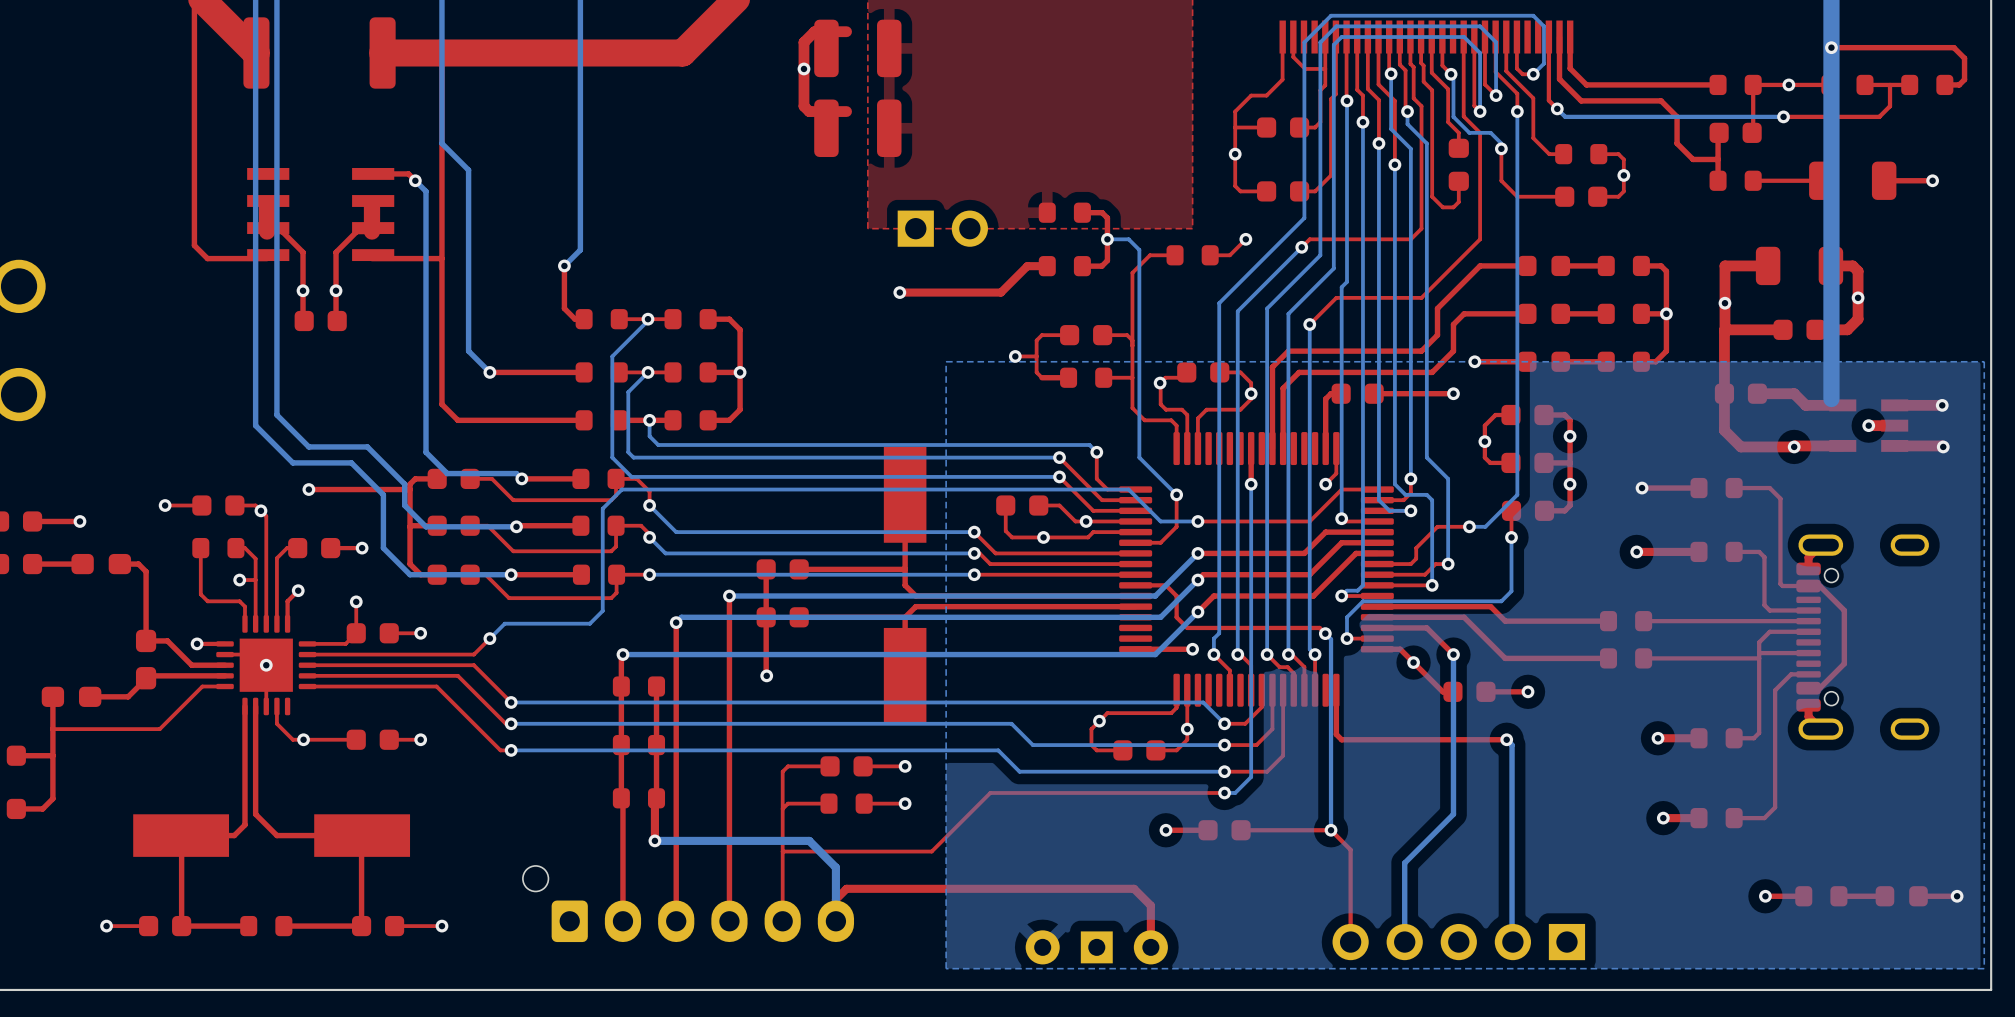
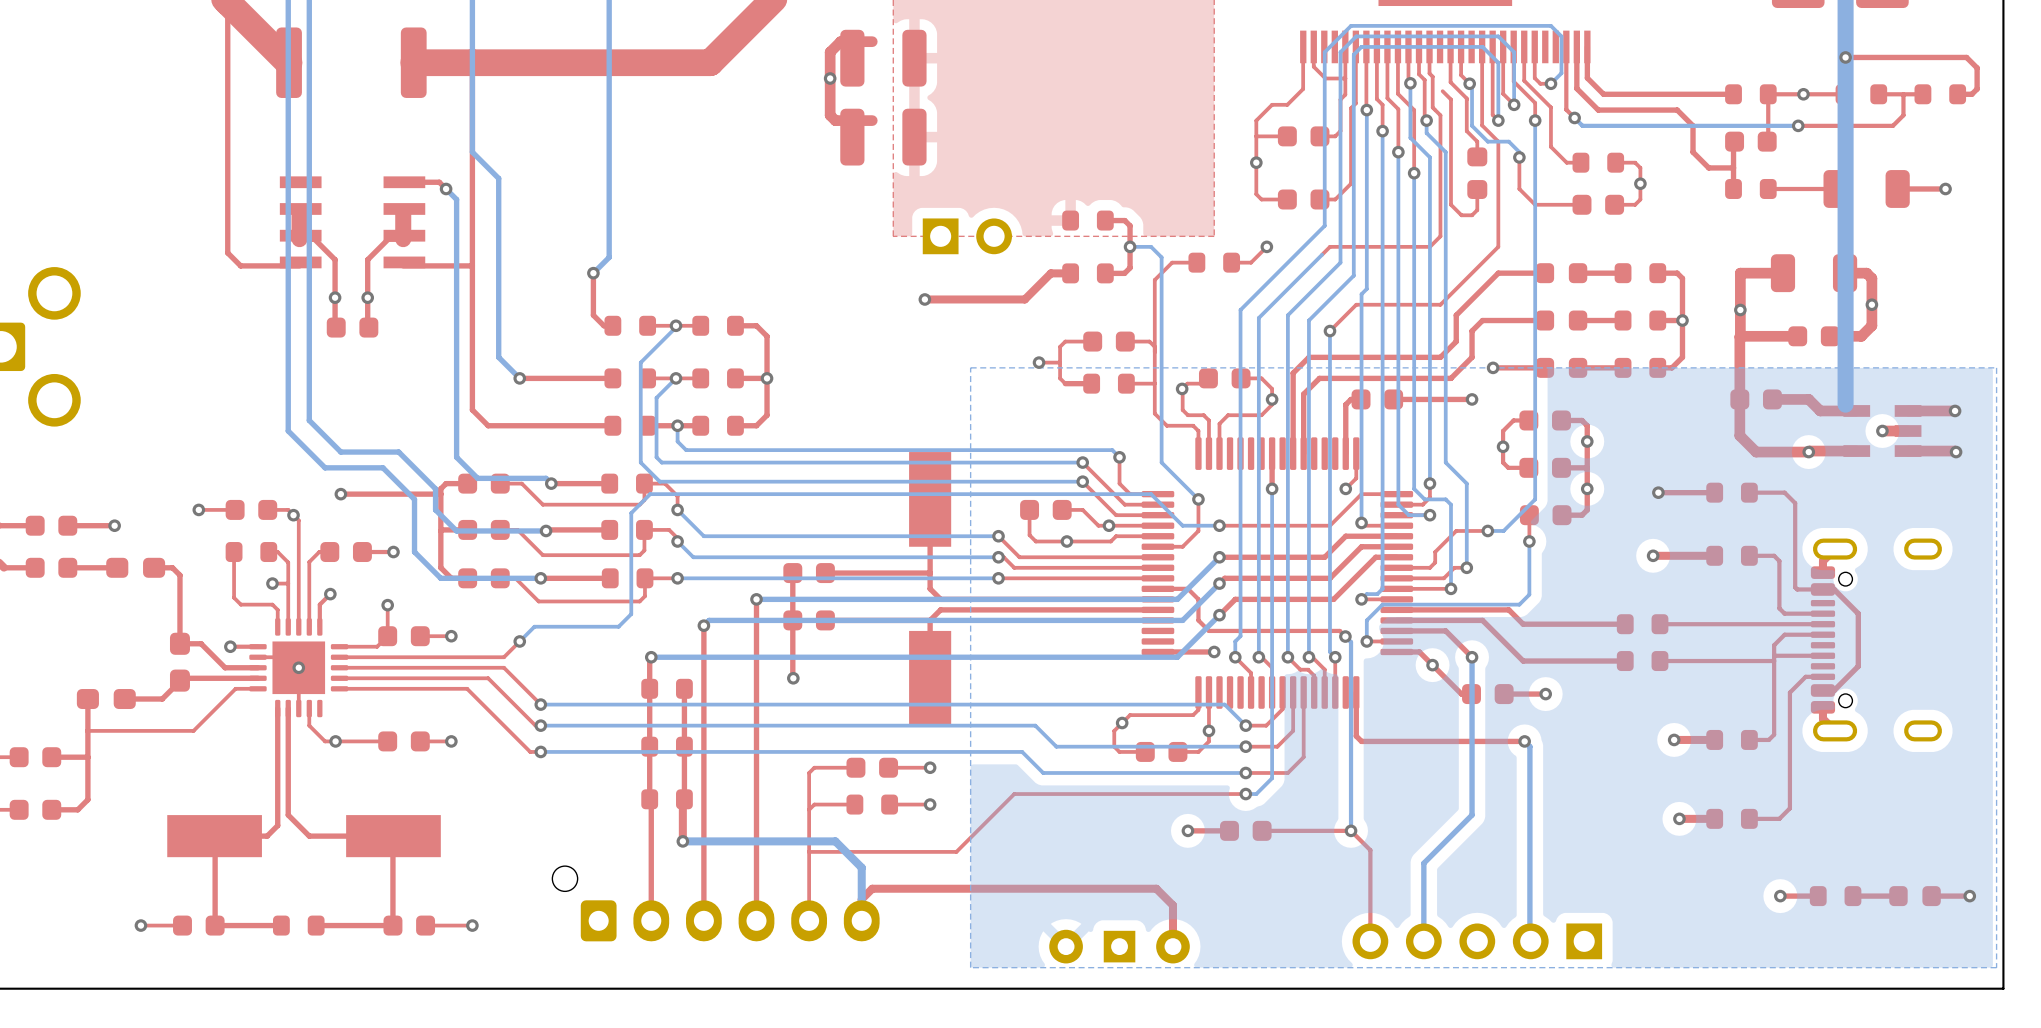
top track: (1421, 37) (1423, 81) -> none
via: (1301, 247) -> none

